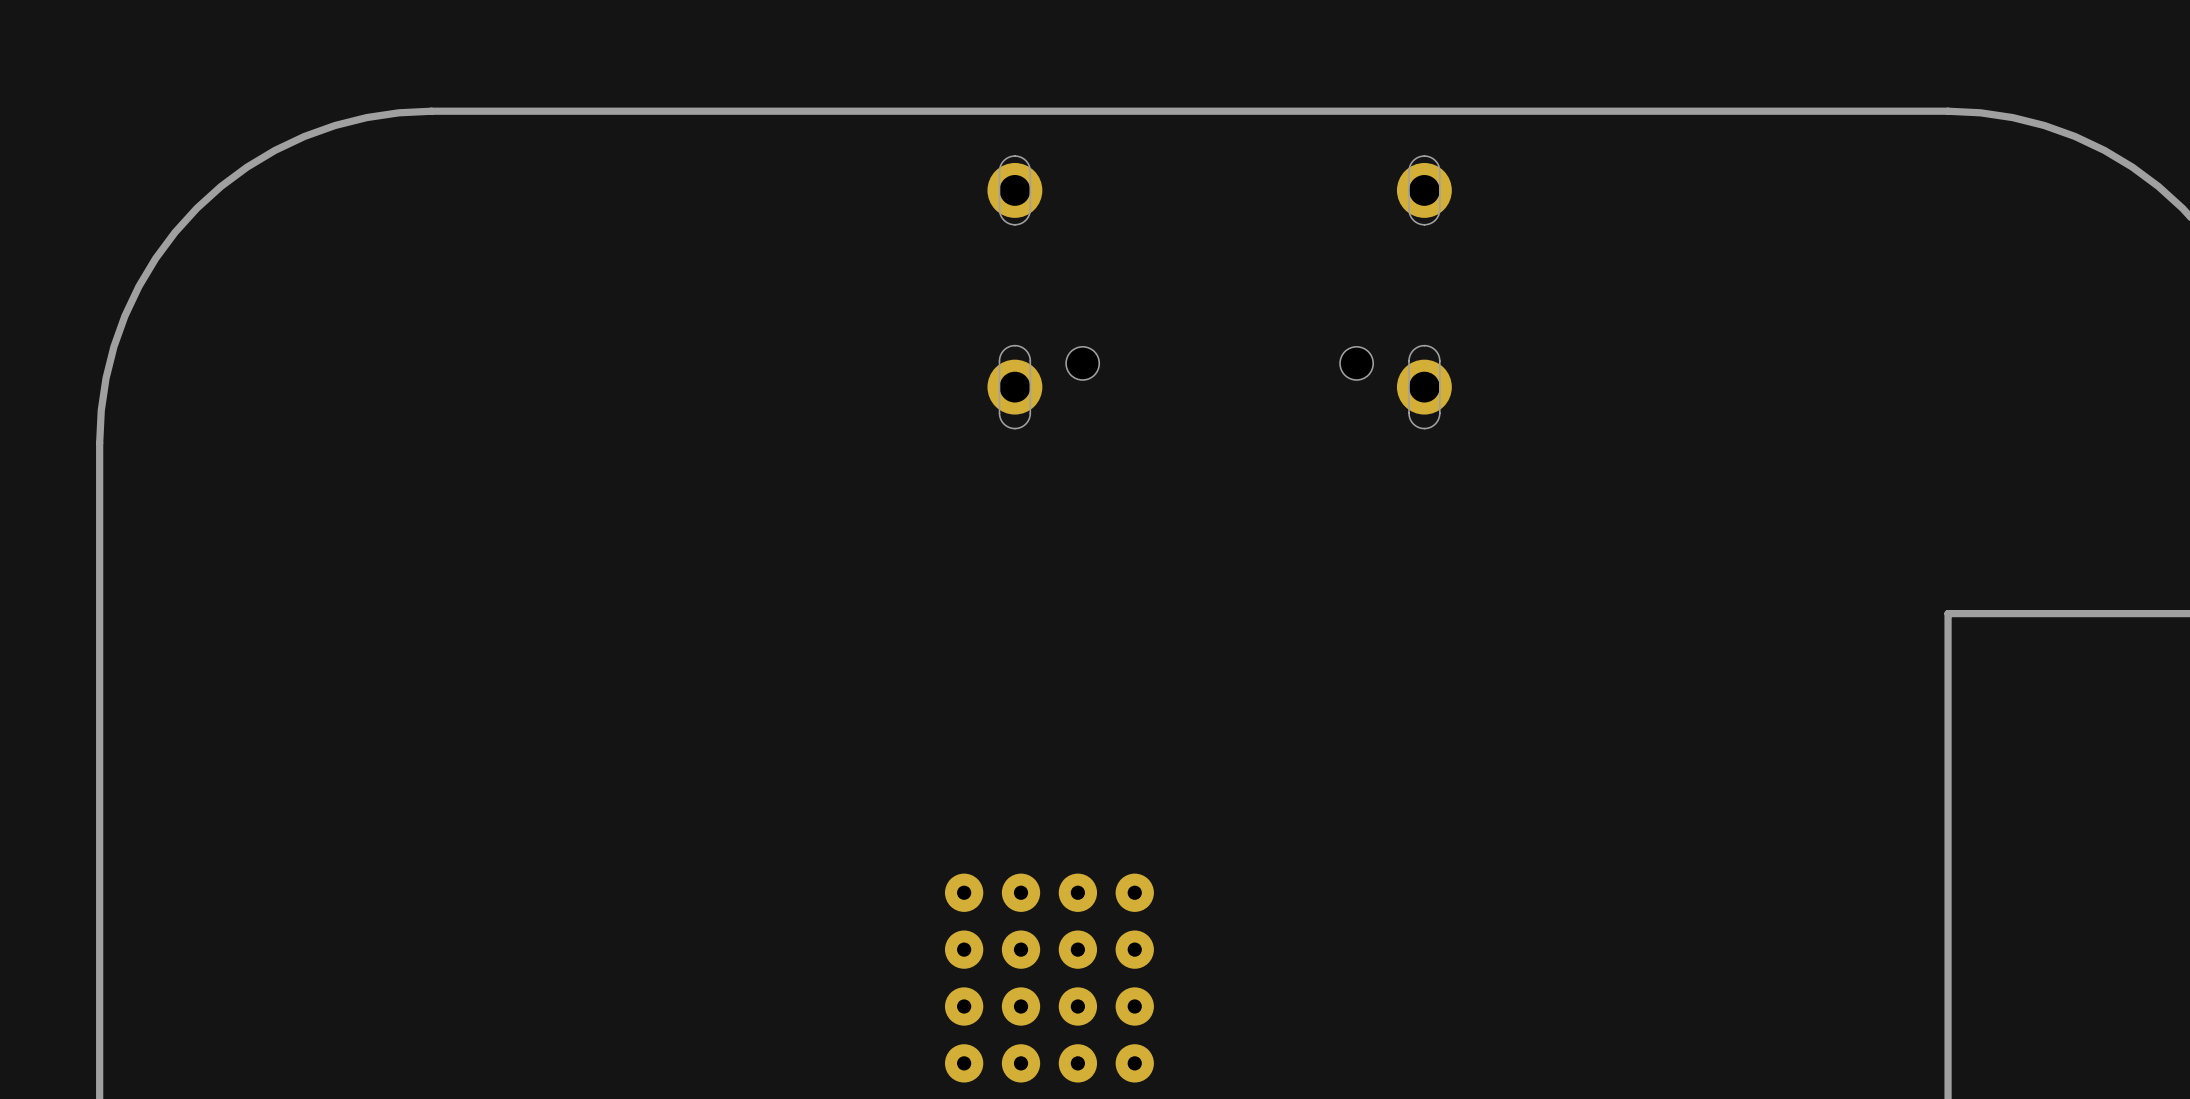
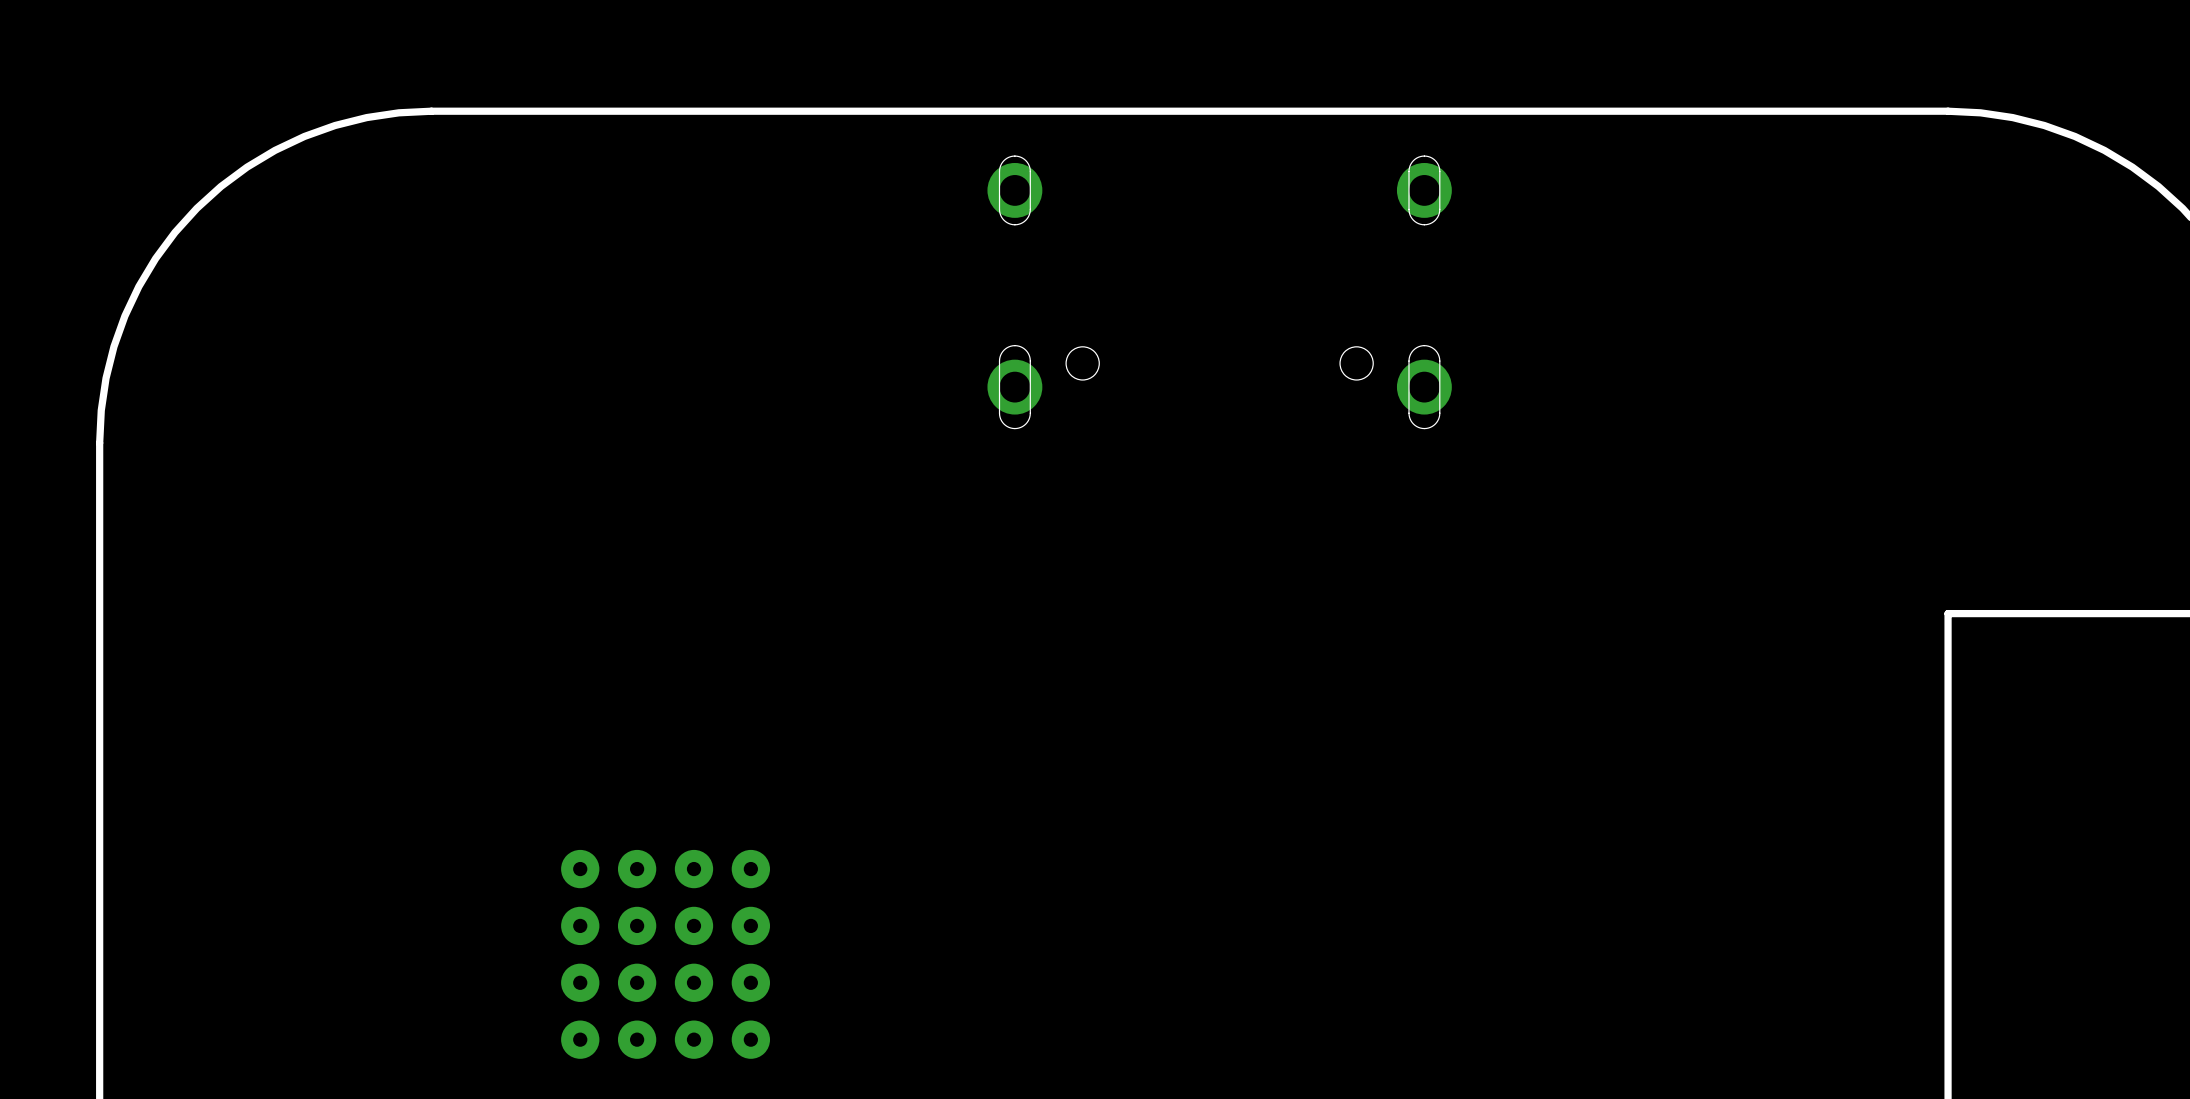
part position: (1049, 978) -> (665, 954)

